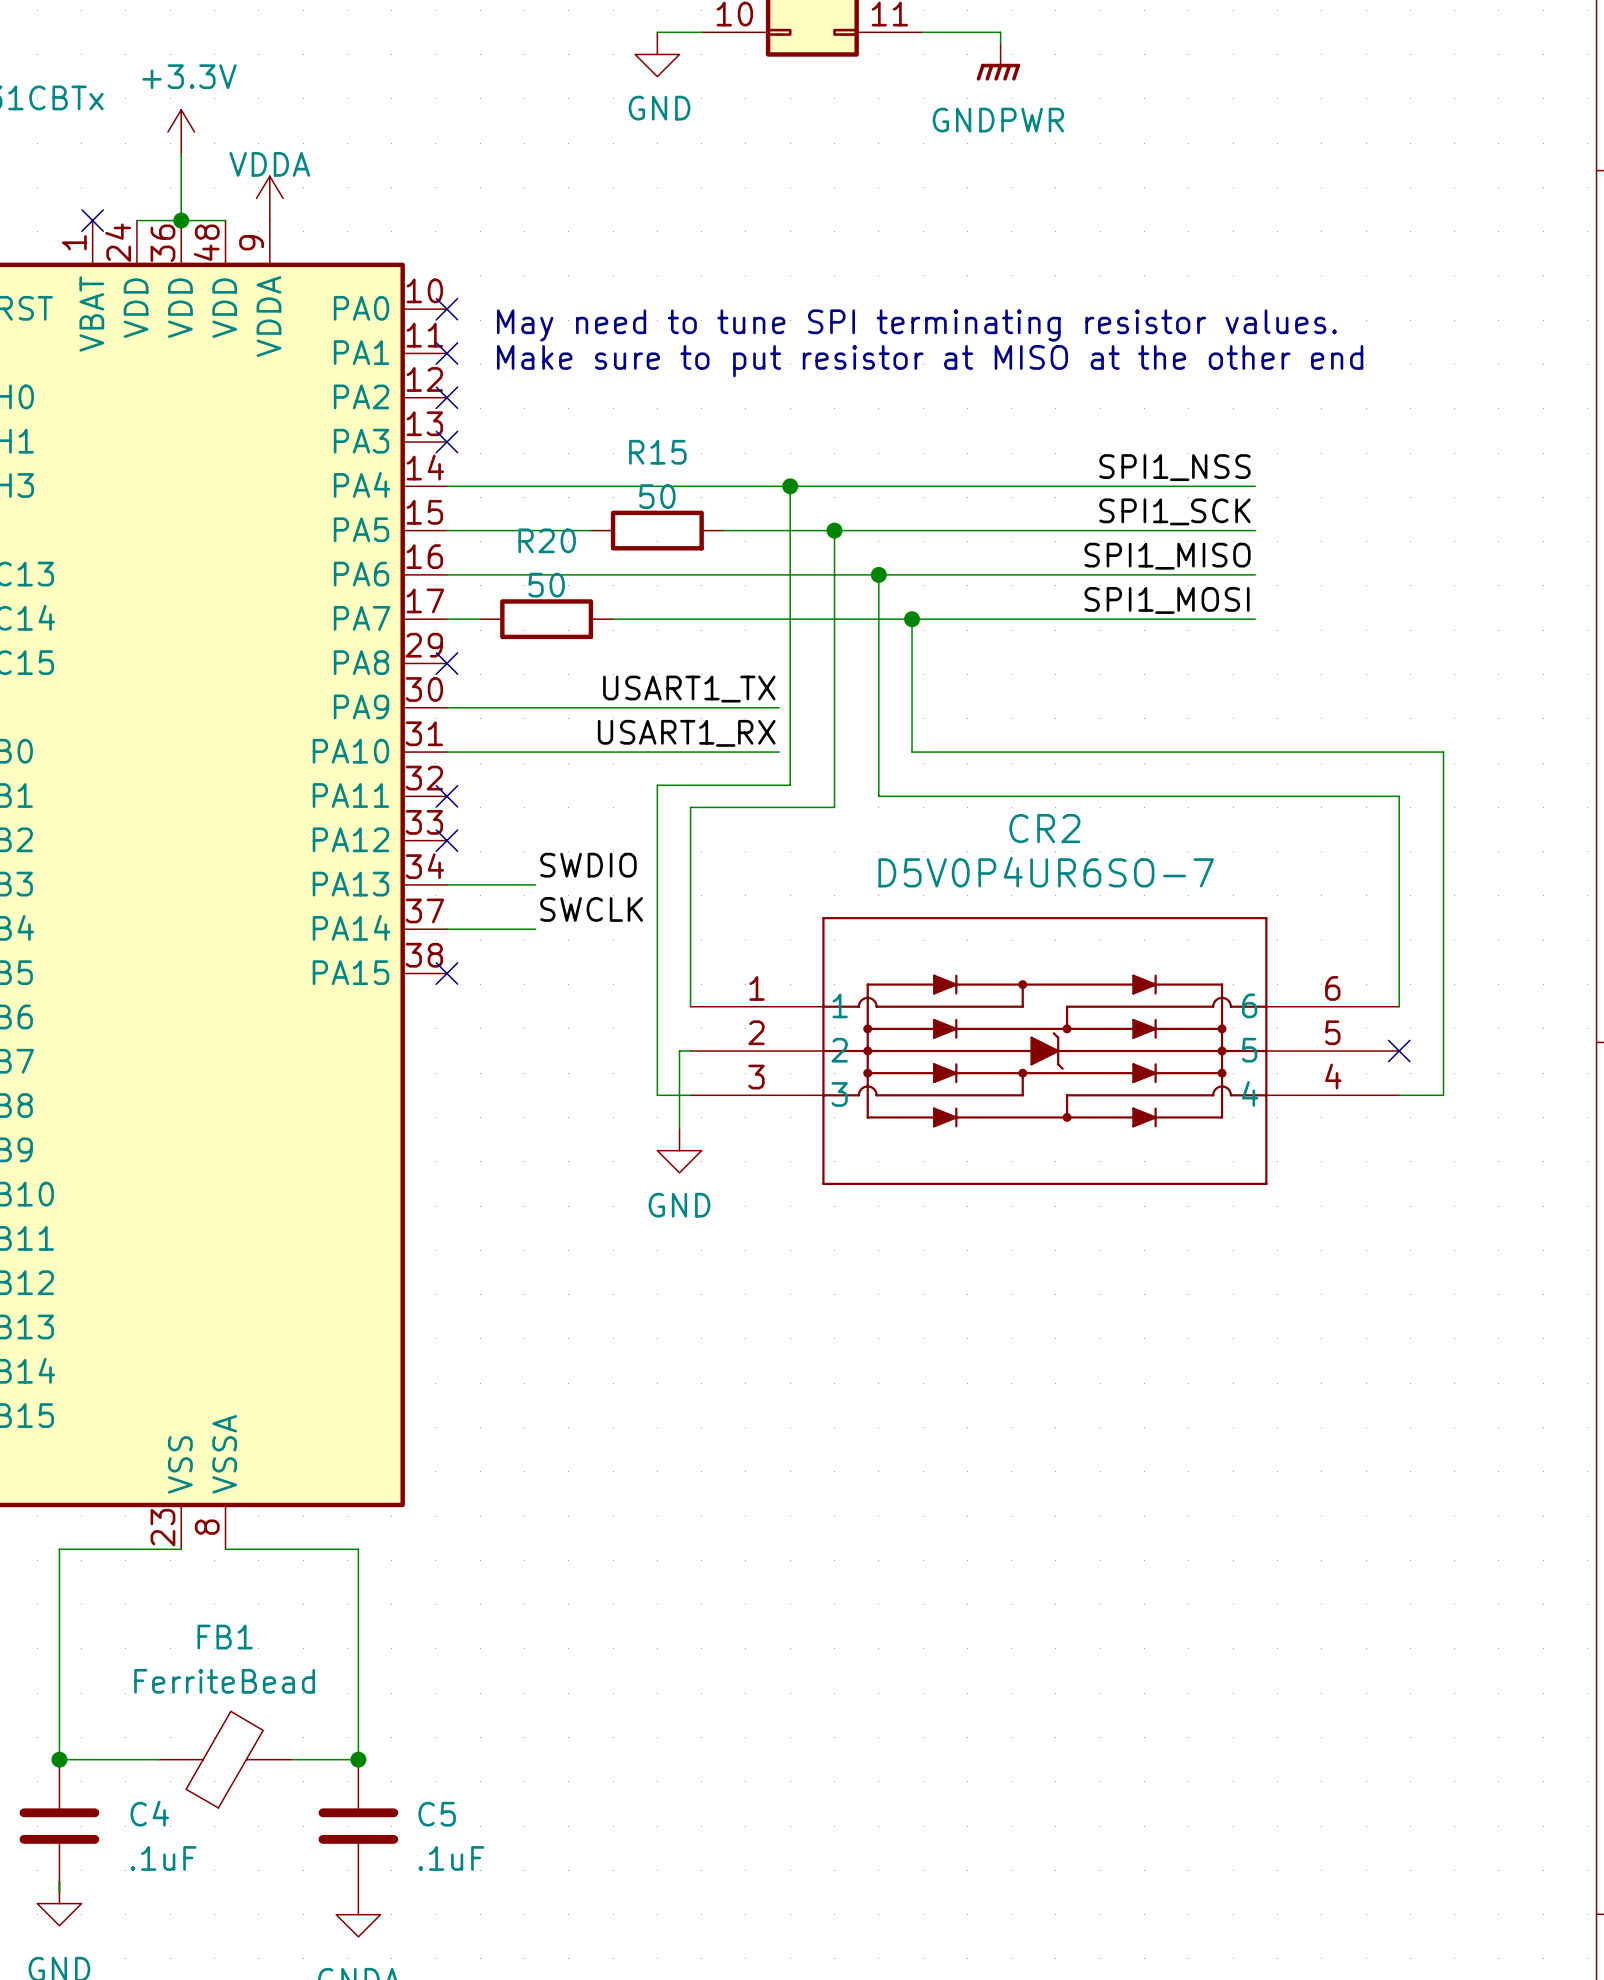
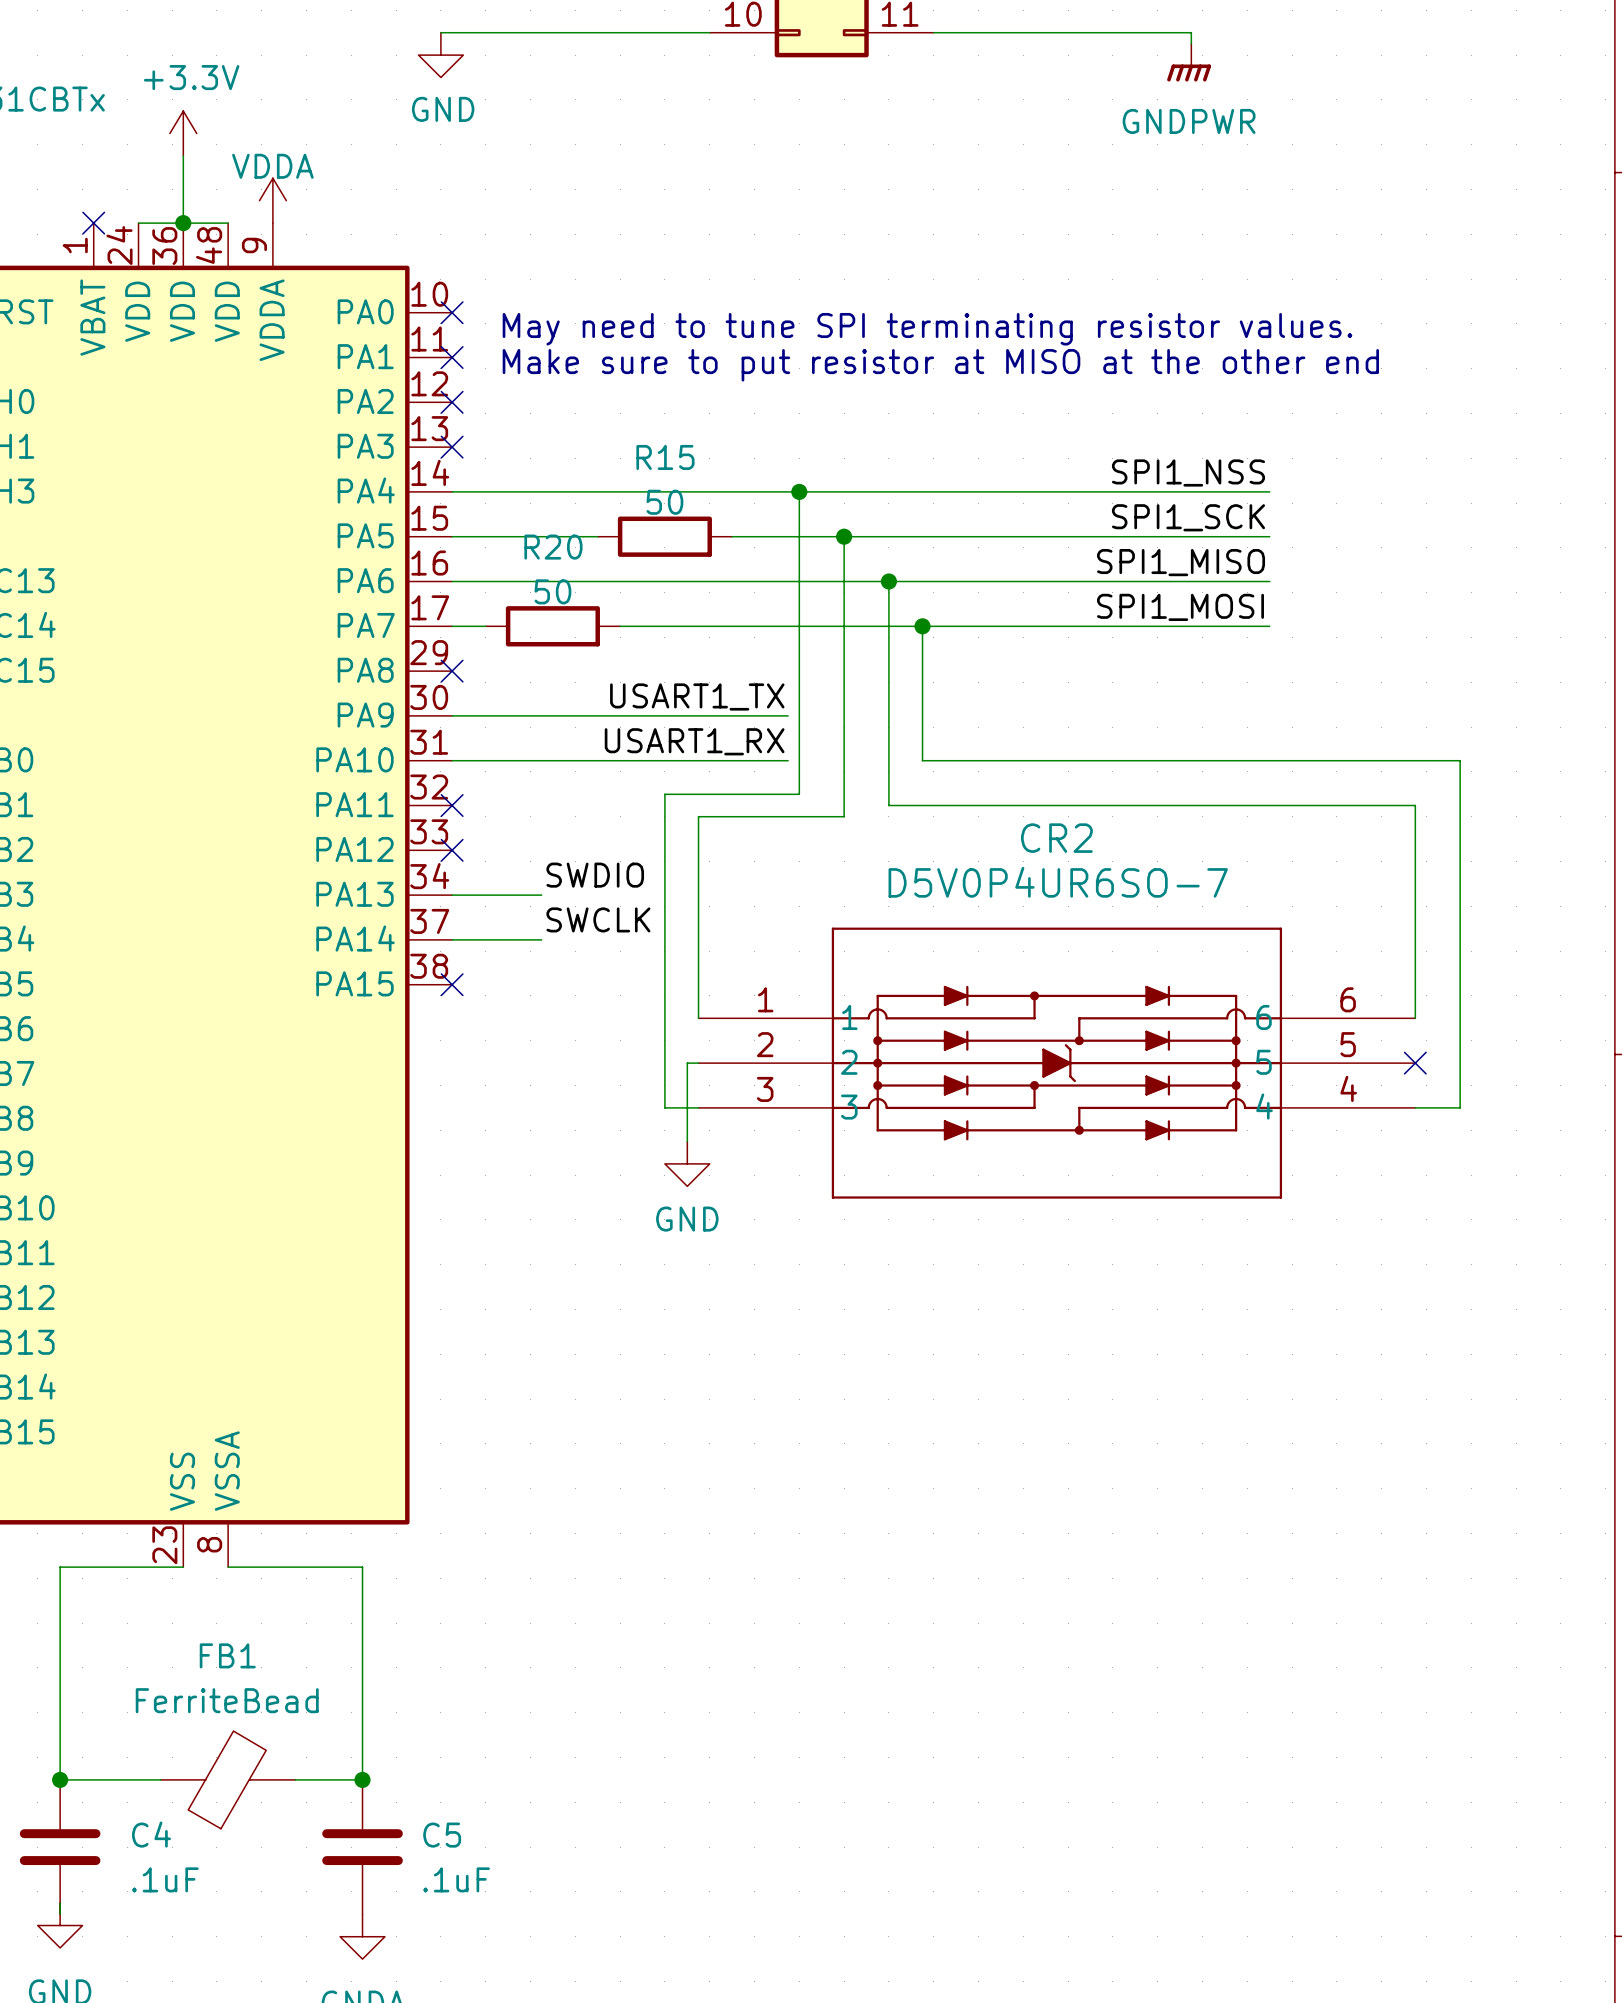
wire: none -> (440, 32) (664, 32)
wire: (1000, 32) (1000, 43) -> (1012, 32) (1191, 32) (1191, 43)
power symbol position: GND (657, 54) -> GND (440, 55)
power symbol position: GNDPWR (998, 62) -> GNDPWR (1189, 62)

